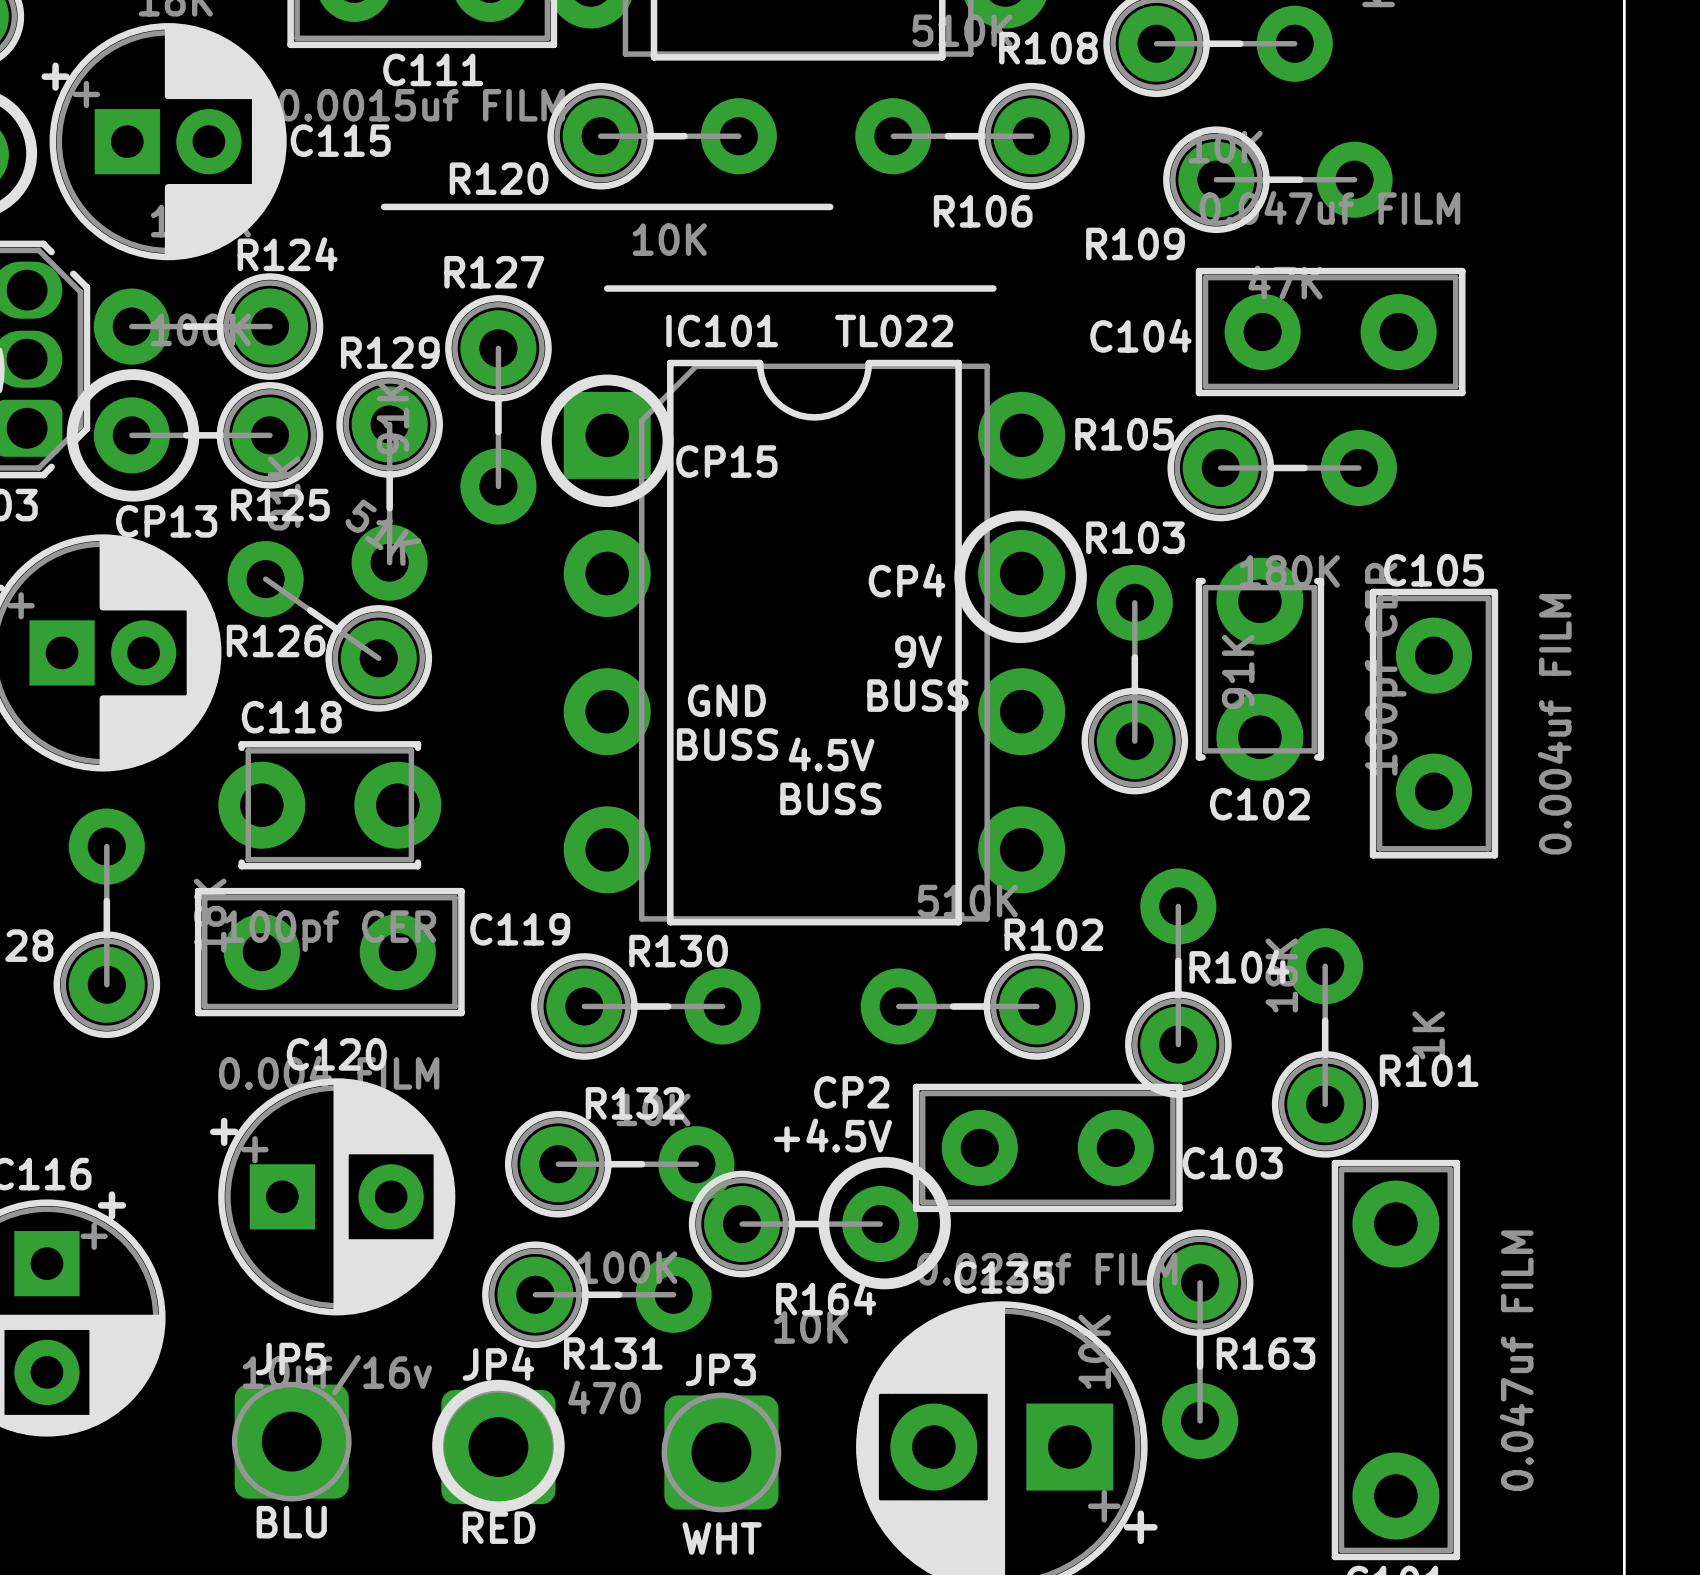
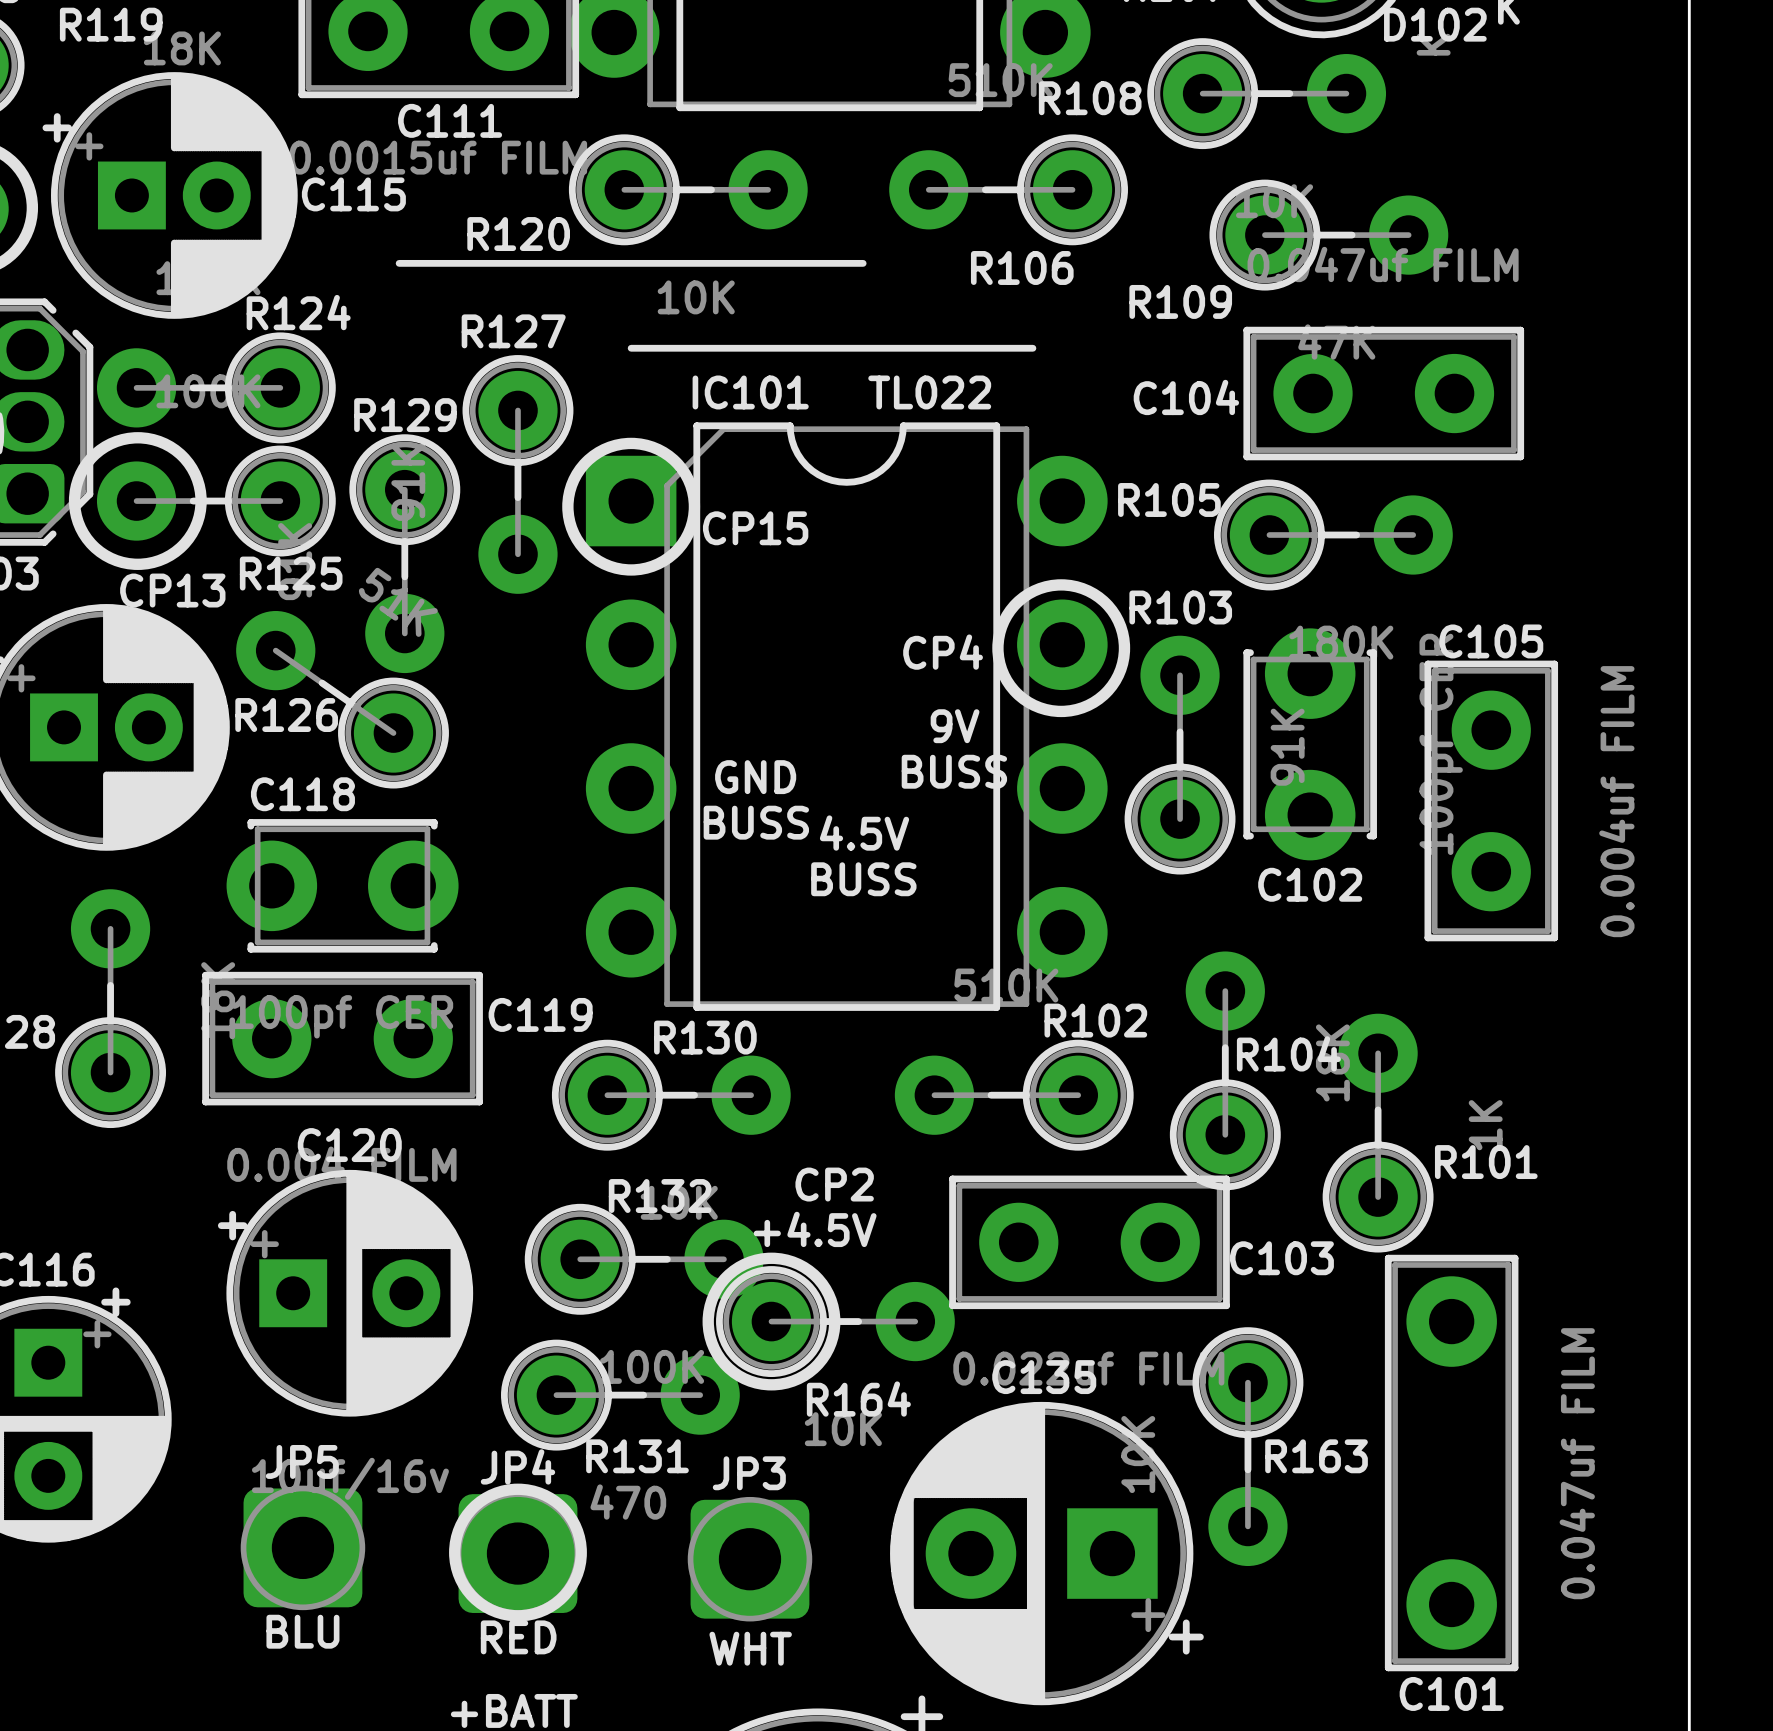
text position: CP2 (851, 1092) -> CP2 (834, 1184)
text position: +4.5V (832, 1135) -> +4.5V (815, 1229)
drawing position: (884, 1223) -> (771, 1321)

